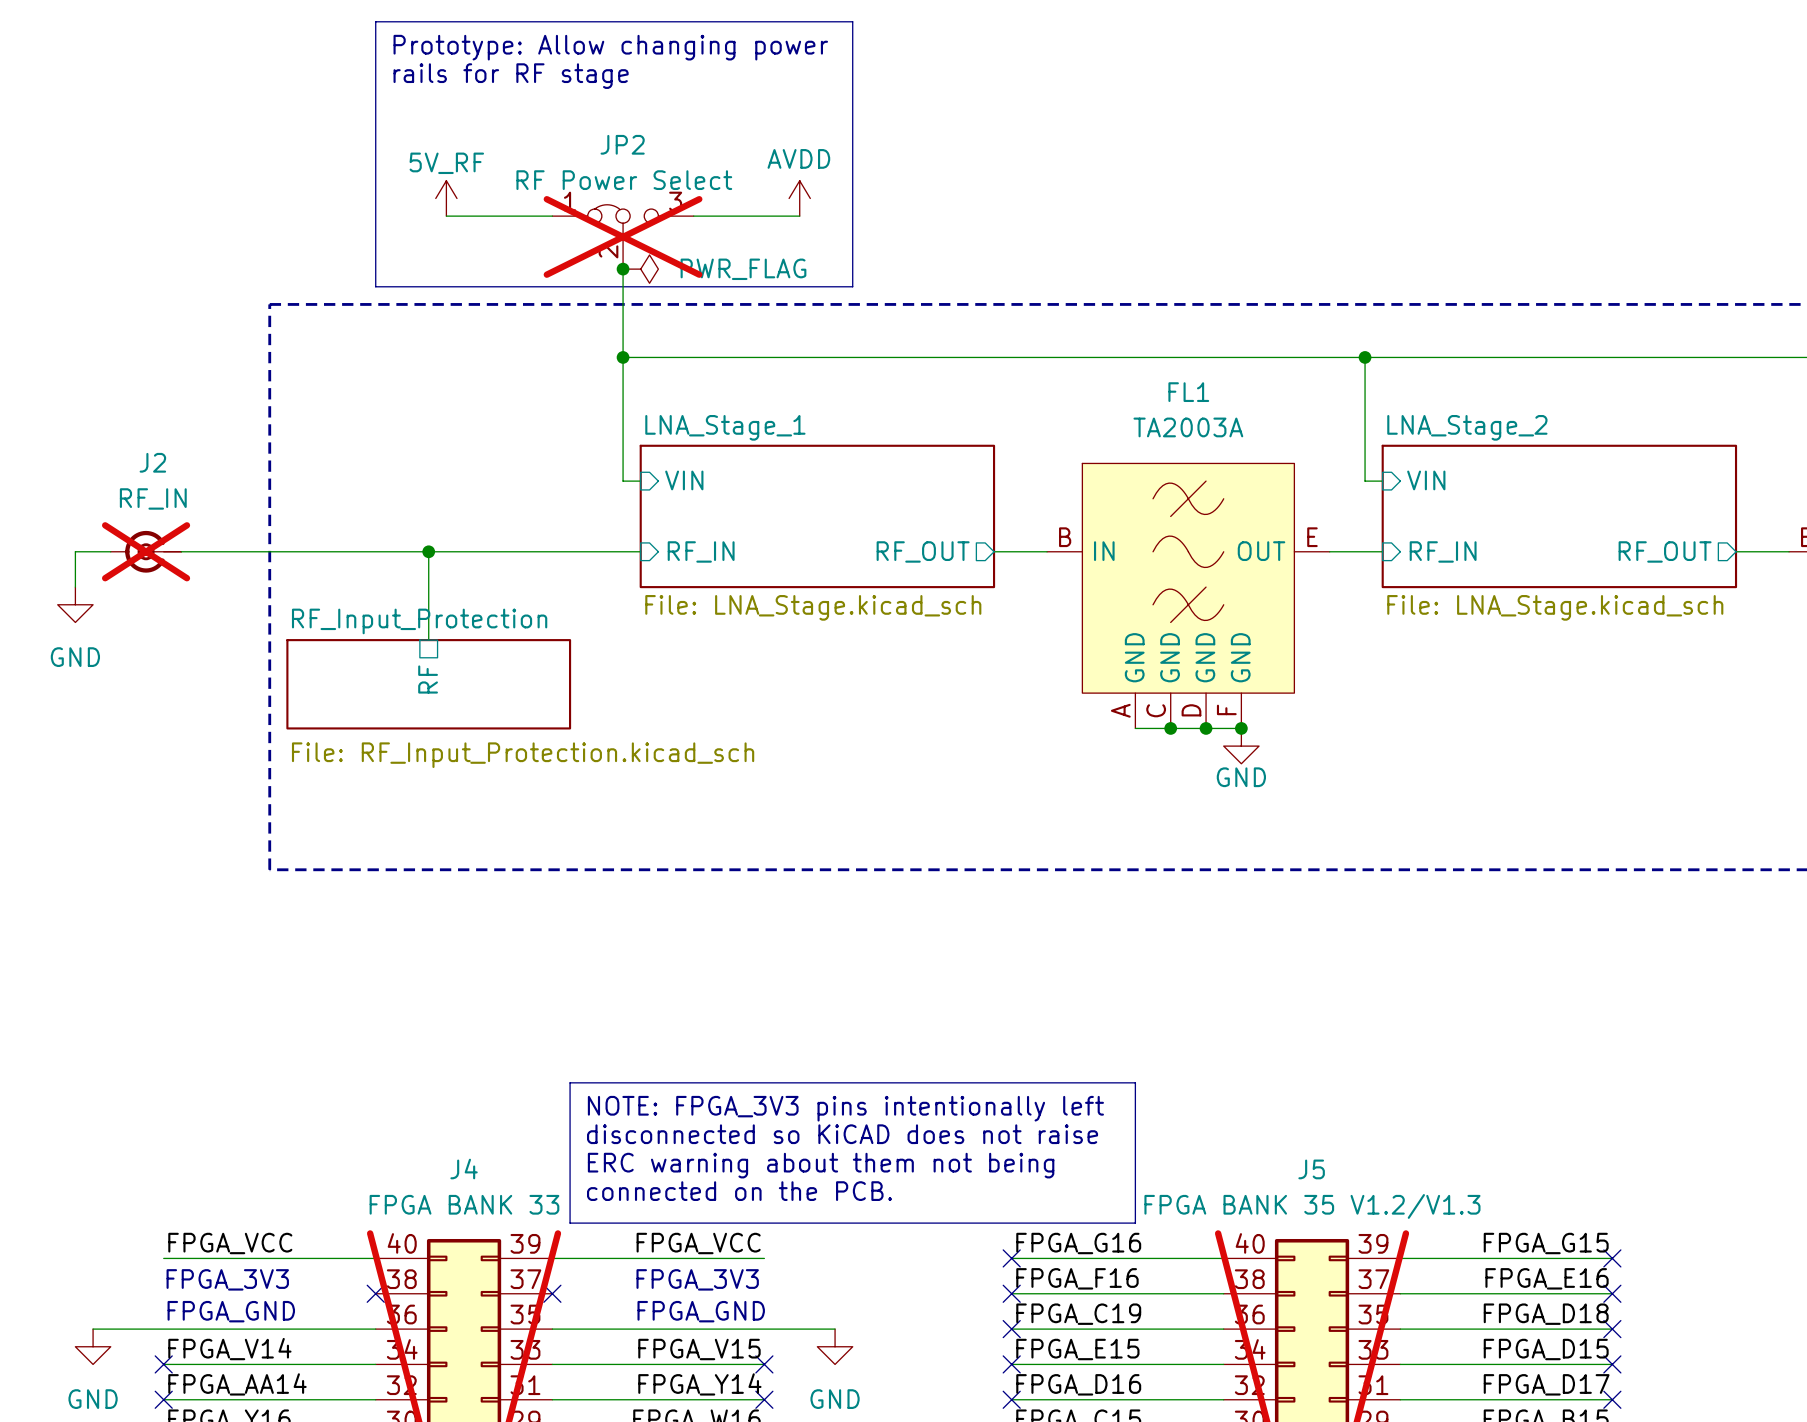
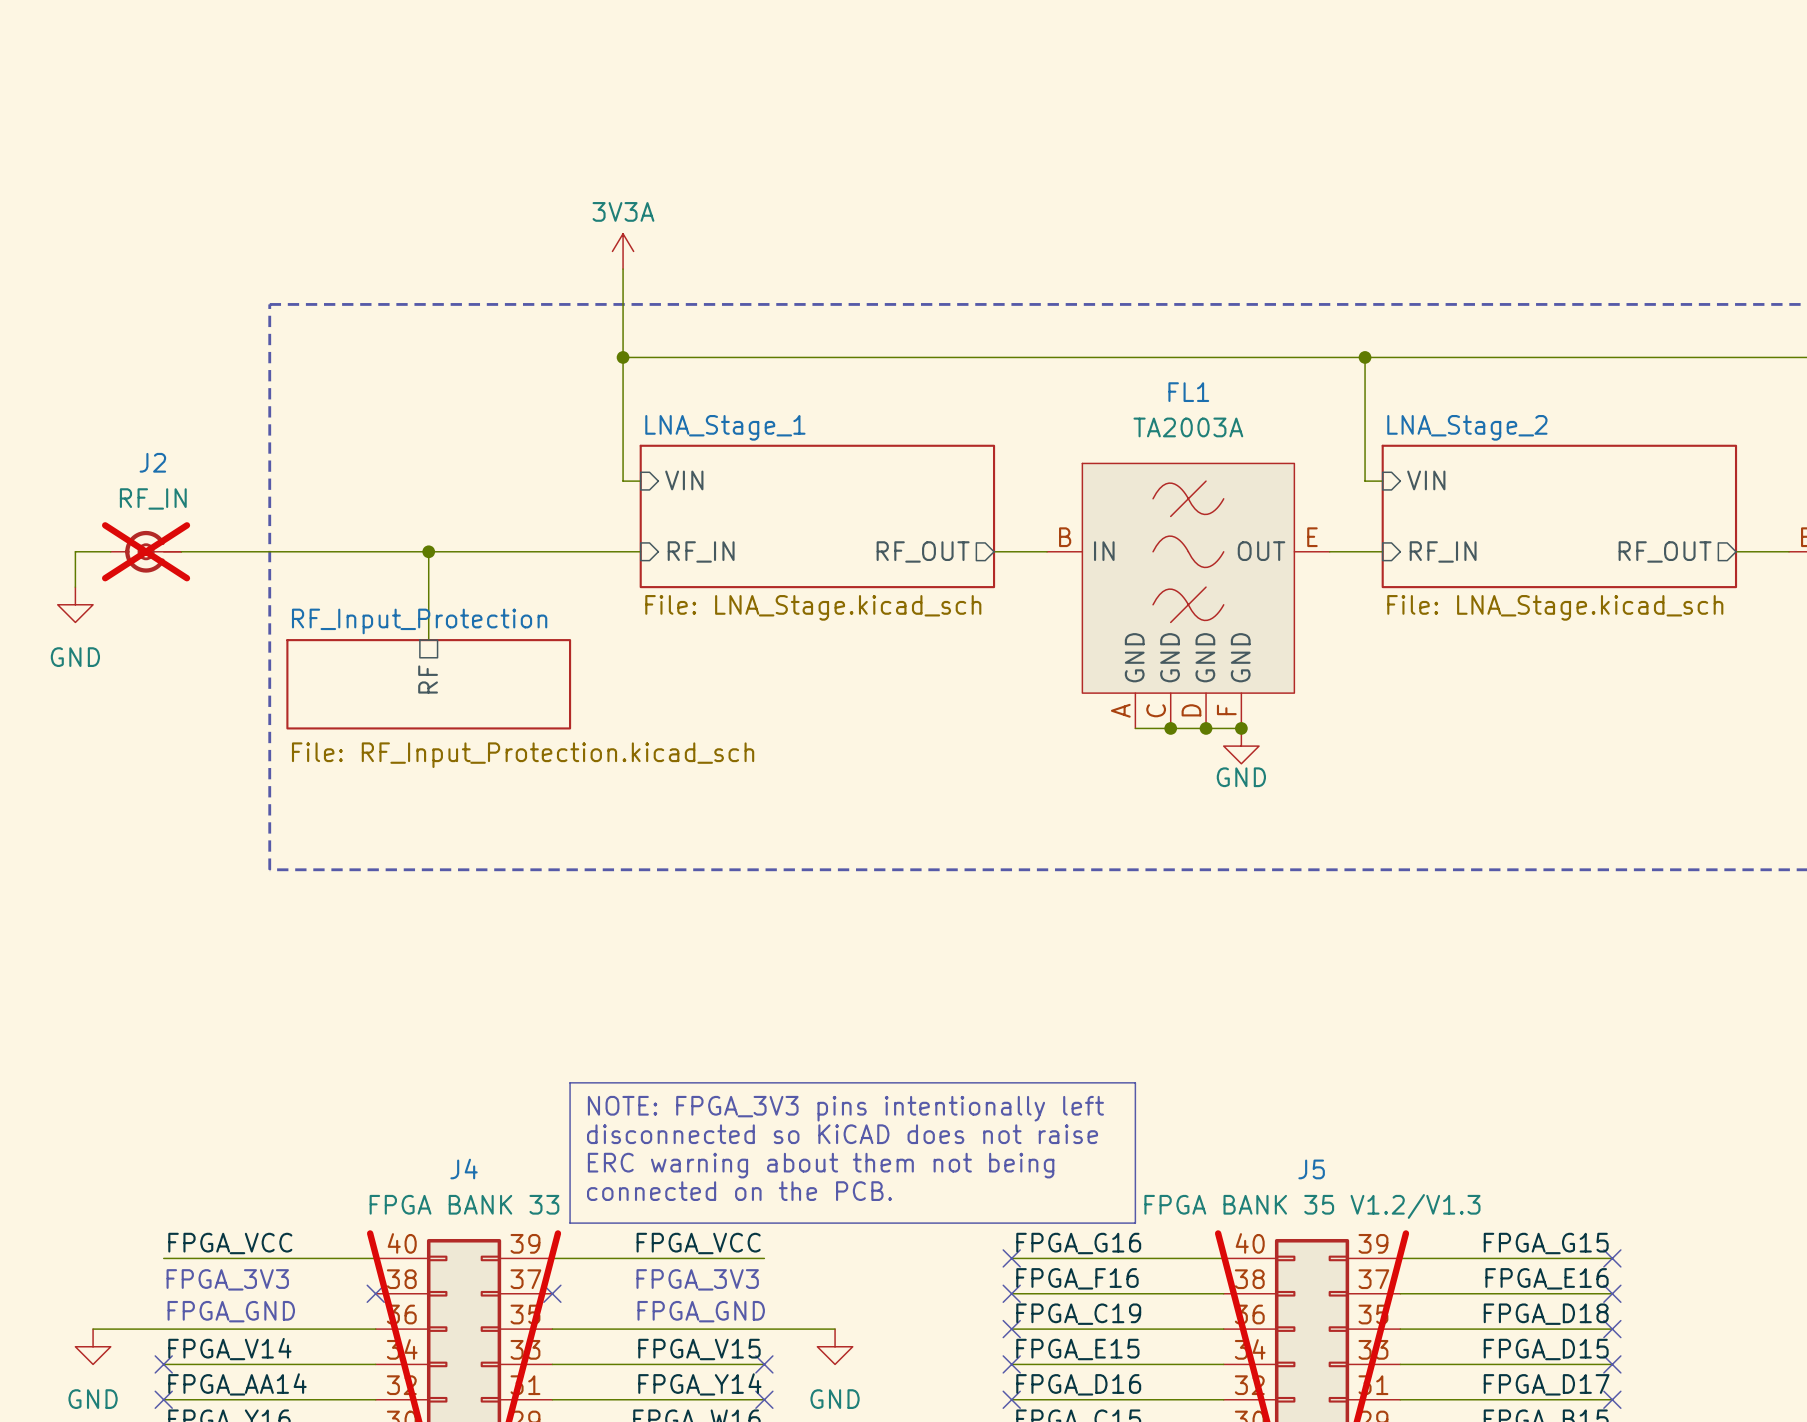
line: (375, 21) (852, 21) (852, 286) (375, 286) (375, 21) -> none
text: Prototype: Allow changing power (610, 47) -> none
text: rails for RF stage (511, 76) -> none
power symbol: 5V_RF (446, 198) -> none
power symbol: AVDD (799, 198) -> none
wire: (446, 216) (552, 216) -> none
wire: (693, 216) (799, 216) -> none
JP2: RF Power Select (623, 236) -> none
power symbol: none -> 3V3A (623, 251)
junction: (623, 269) -> none
power symbol: PWR_FLAG (640, 269) -> none

